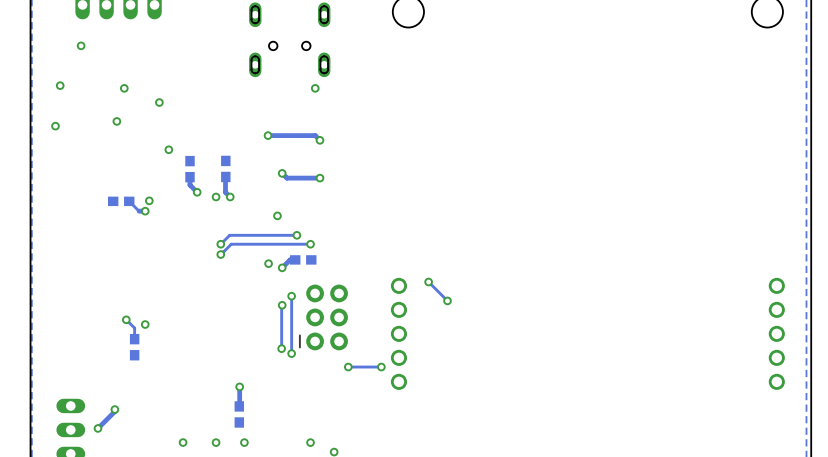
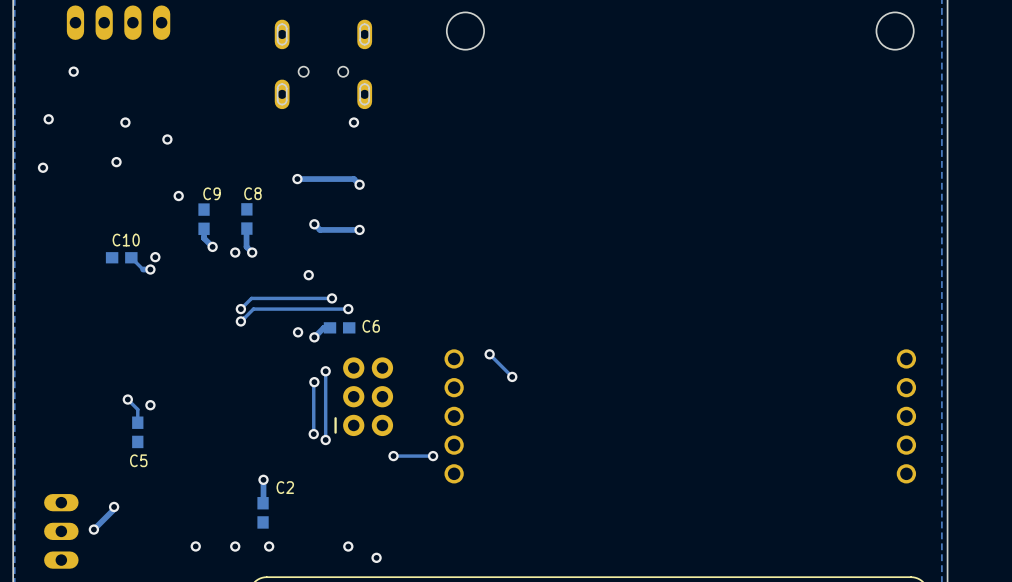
C9 name: none -> C9 (212, 193)
C8 name: none -> C8 (252, 193)
C10 name: none -> C10 (126, 240)
C6 name: none -> C6 (371, 326)
C5 name: none -> C5 (138, 460)
C2 name: none -> C2 (285, 487)

